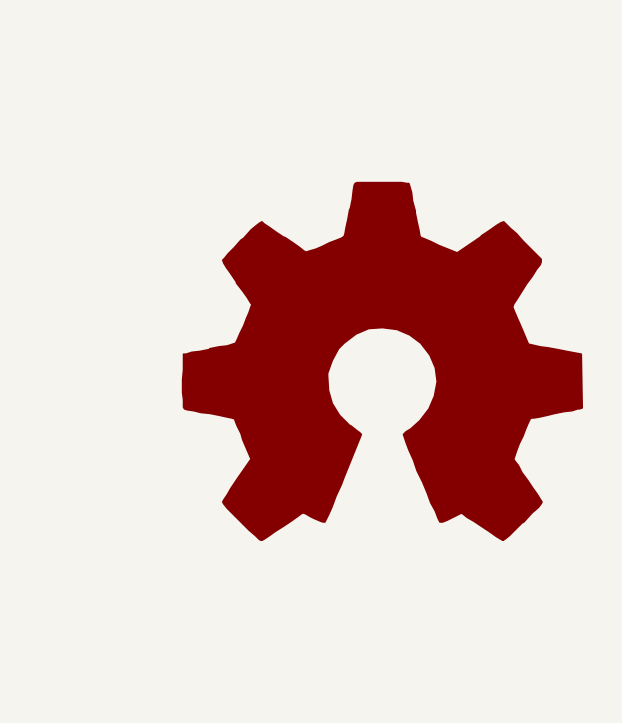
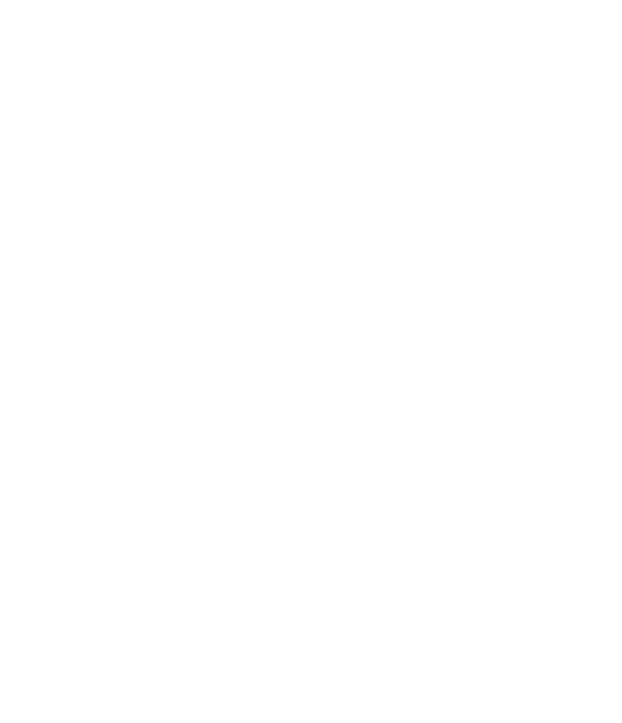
power symbol: (382, 361) -> none

